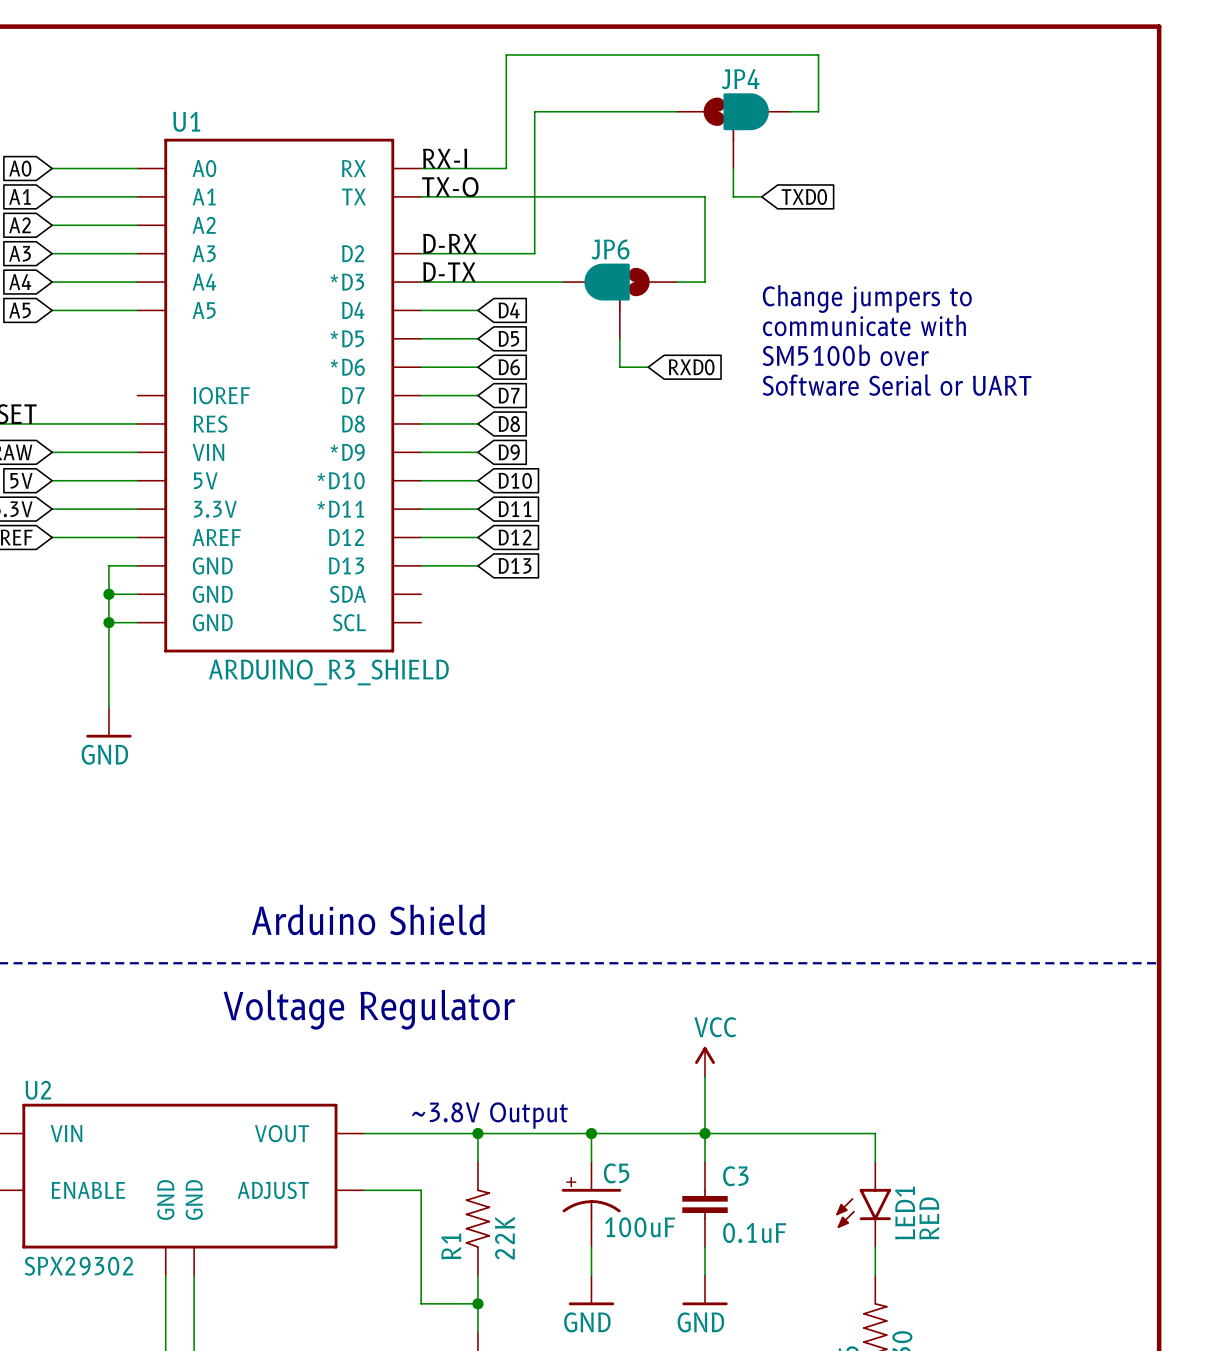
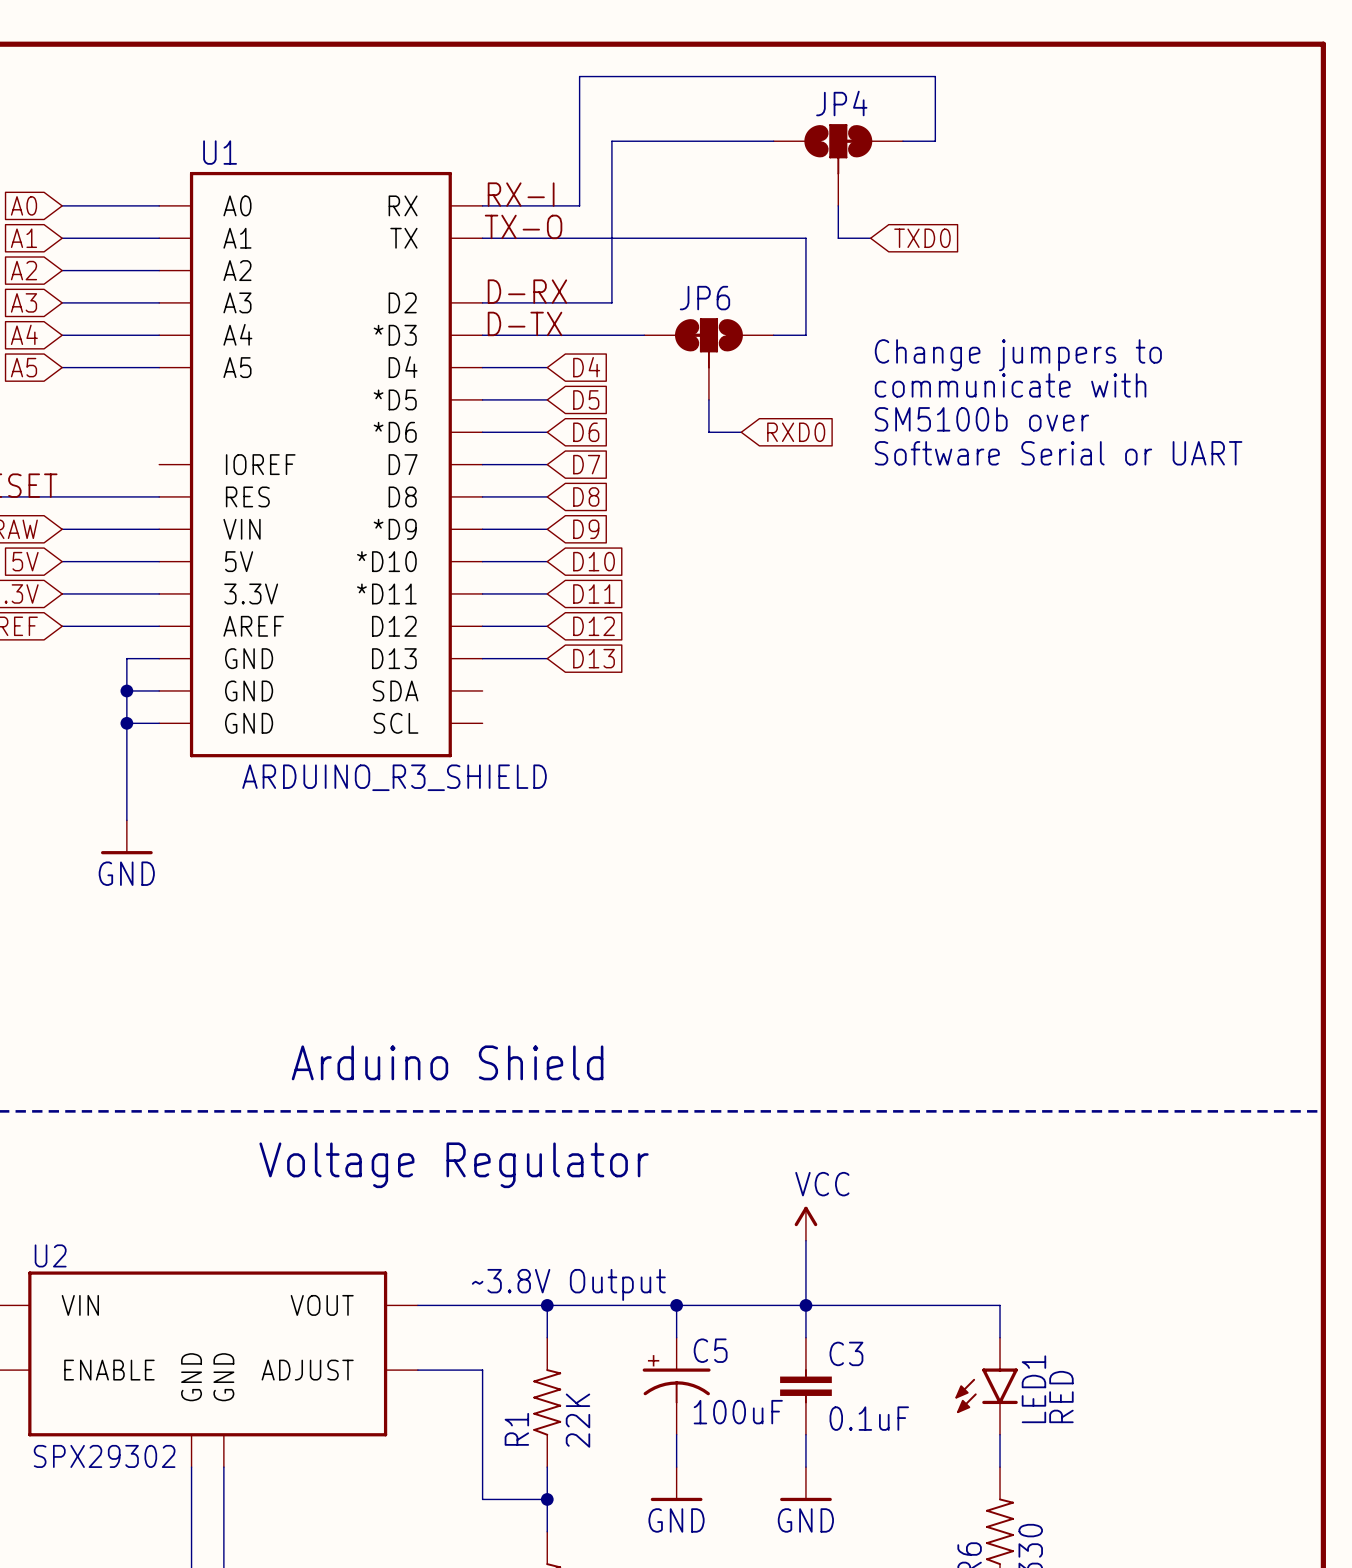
JP4 symbol: [676, 93, 791, 169] -> [773, 124, 903, 206]
JP6 symbol: [563, 263, 677, 339] -> [644, 318, 774, 400]

